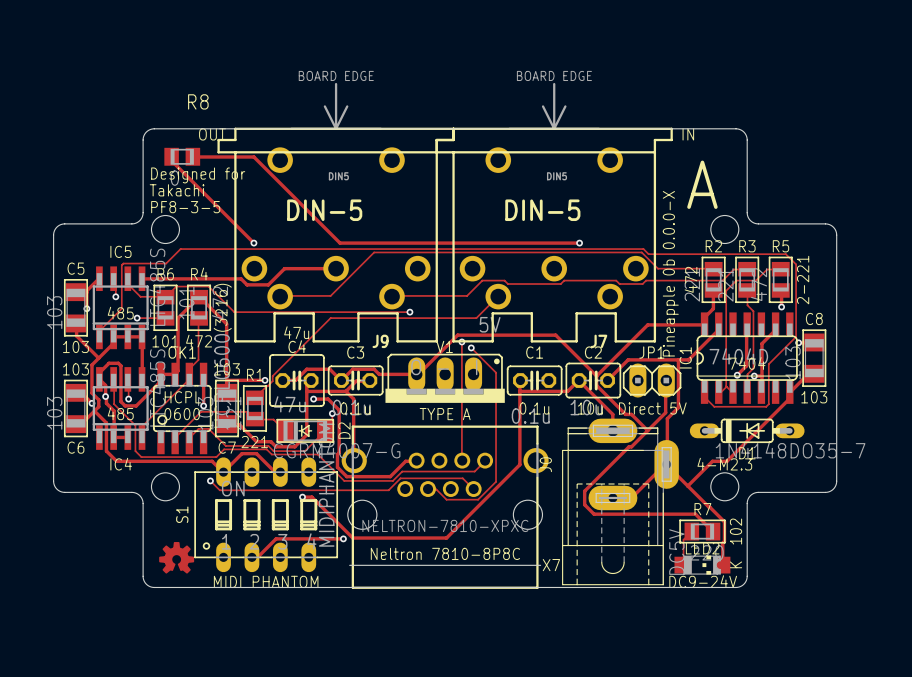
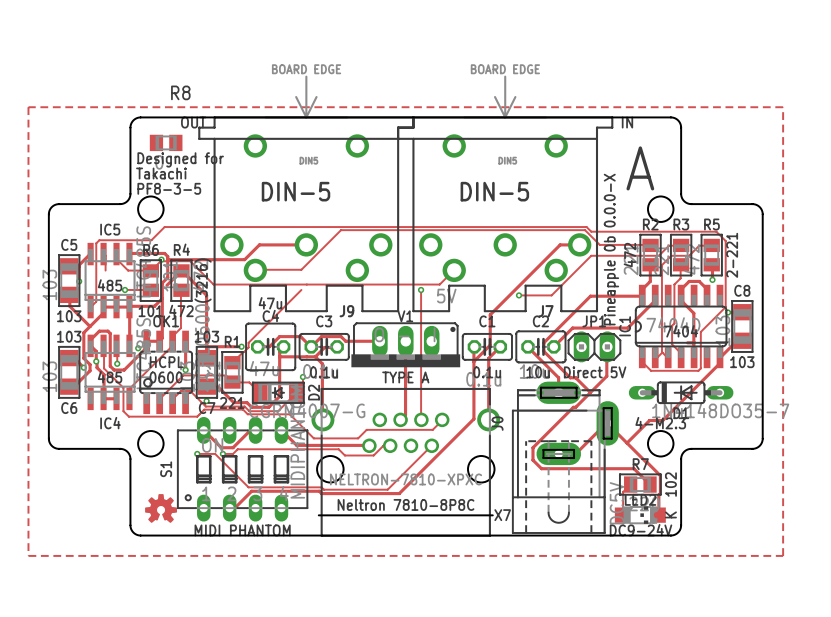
zone outline: none -> (28, 107) (783, 107) (783, 555) (28, 555) (28, 107)
track: (171, 156) (172, 161) (253, 243) -> none
track: (192, 156) (253, 156) (340, 243) (579, 243) -> none
via: (253, 243) -> none
via: (579, 243) -> none
track: (123, 263) (121, 265) (121, 308) (99, 330) (99, 336) -> (112, 240) (99, 240) (96, 243) (96, 301) (90, 307)
track: none -> (579, 244) (560, 244) (490, 314) (490, 345) (473, 361)
track: (142, 278) (241, 278) (247, 284) -> (167, 259) (225, 259)
track: (648, 280) (642, 284) (619, 284) (616, 280) (564, 280) (560, 284) (507, 284) (504, 280) (482, 280) (467, 295) (392, 296) -> (591, 255) (551, 295) (519, 295)
via: none -> (161, 259)
track: (747, 290) (747, 305) (753, 311) (753, 368) (747, 374) (747, 392) -> (681, 264) (680, 278) (674, 284) (674, 323) (672, 325) (672, 344) (680, 352) (681, 357)
via: (115, 296) -> none
track: (183, 312) (178, 318) -> (129, 254) (164, 253) (167, 256) (167, 277) (162, 282) (162, 289)
via: (409, 312) -> none
track: (482, 312) (476, 318) (330, 318) -> (439, 284) (373, 284)
track: none -> (421, 289) (421, 311)
via: none -> (421, 289)
track: (747, 323) (746, 365) (737, 375) -> none
track: (775, 323) (774, 330) (761, 343) (761, 392) -> (707, 295) (706, 288) (699, 281) (689, 281) (681, 289) (682, 301) (693, 313) (694, 357)
via: none -> (519, 295)
track: none -> (162, 298) (154, 306) (129, 307)
via: (461, 341) -> none
track: (471, 347) (496, 372) (496, 481) (478, 499) (446, 499) (436, 489) (428, 489) -> (222, 453) (233, 453) (237, 449) (338, 449) (344, 455) (373, 455) (383, 446) (390, 445)
via: (471, 347) -> none
track: (678, 359) (678, 407) (667, 418) (666, 464) -> none
track: (416, 374) (457, 335) (555, 335) (596, 376) -> none
track: none -> (405, 341) (405, 415) (400, 419)
via: (737, 375) -> none
via: (754, 376) -> none
track: none -> (500, 346) (488, 358) (488, 419)
track: (579, 380) (567, 391) (519, 391) -> none
via: none -> (138, 348)
track: (313, 399) (328, 399) (339, 410) (337, 467) (346, 476) (390, 476) (405, 461) (416, 460) -> none
via: (313, 399) -> none
track: (94, 411) (106, 422) (106, 451) (116, 461) (212, 461) (223, 472) (241, 453) (256, 453) (274, 471) (280, 472) -> (203, 430) (221, 447) (233, 447) (250, 430) (255, 430)
via: none -> (206, 401)
track: (519, 459) (519, 464) (446, 538) (352, 538) (311, 497) (302, 497) -> (473, 418) (399, 493) (321, 493) (319, 491) (313, 491)
track: none -> (281, 430) (296, 445) (369, 445)
track: (210, 480) (219, 490) (388, 490) (400, 478) (462, 478) (473, 489) -> (197, 453) (215, 453) (248, 487) (387, 489) (431, 445)
via position: (210, 480) -> (197, 453)
via: none -> (222, 453)
via: (302, 497) -> none
via: (343, 538) -> none

